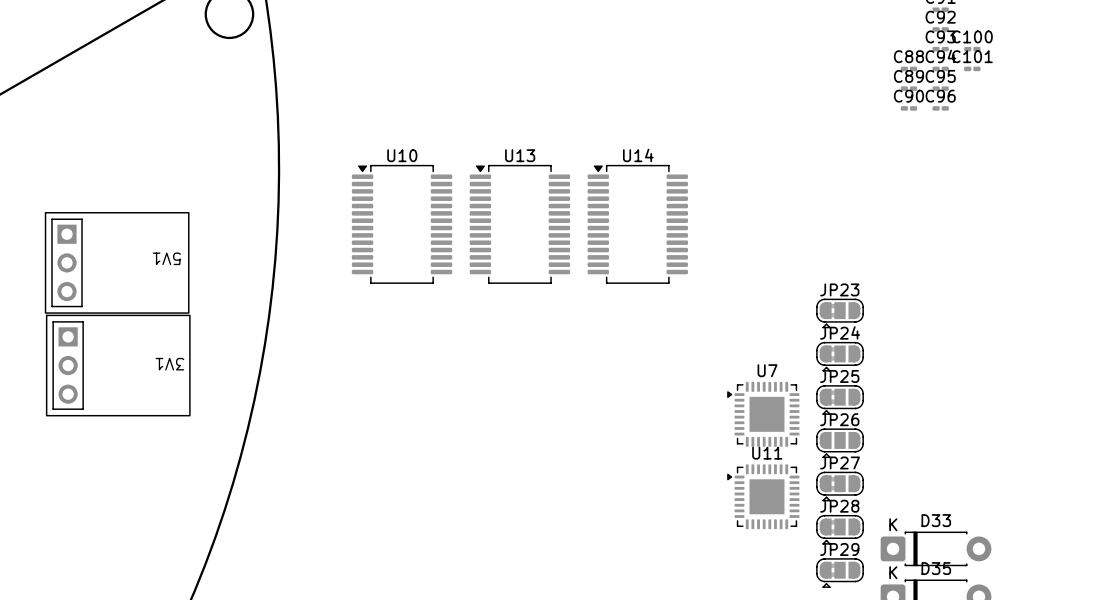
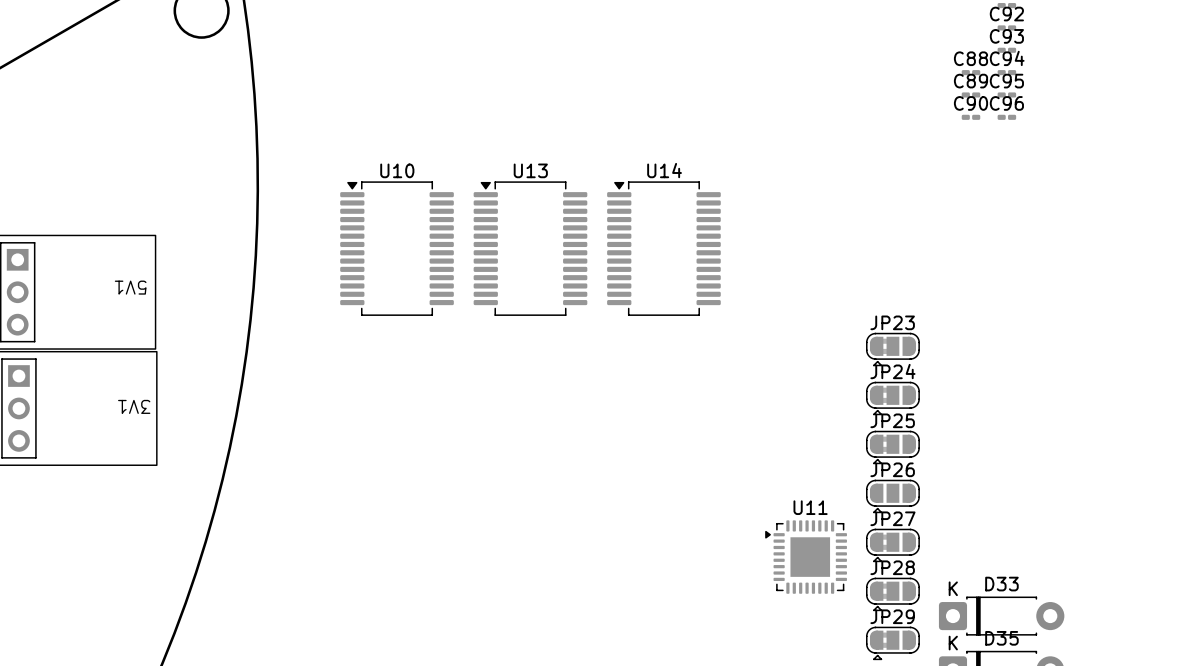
C100: (972, 49) -> none
C101: (972, 68) -> none
U7: (763, 414) -> none

